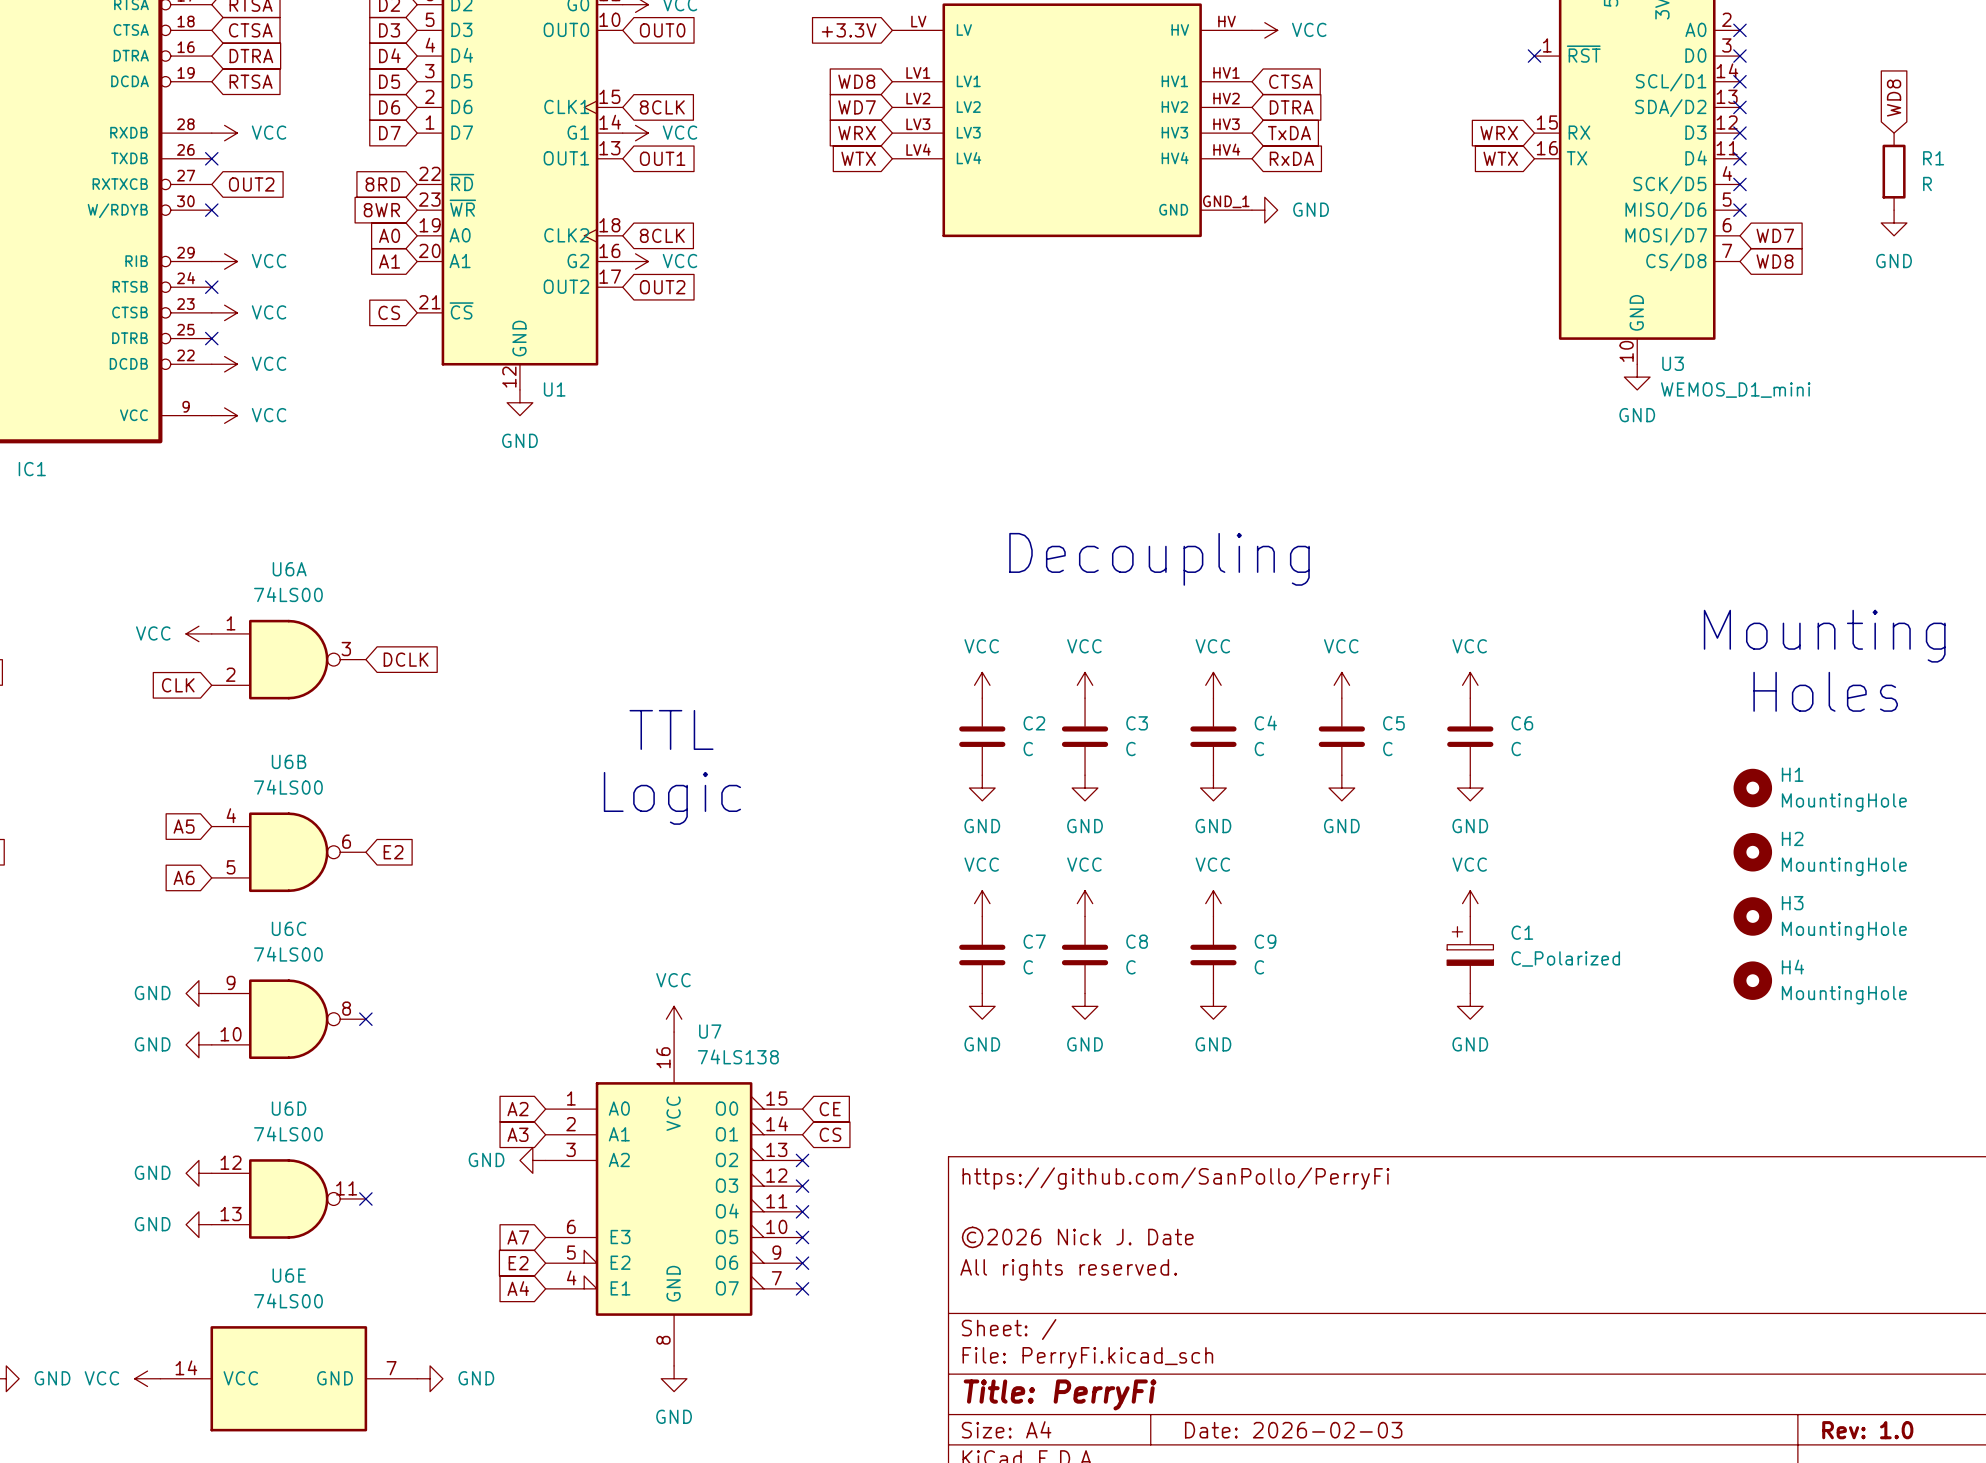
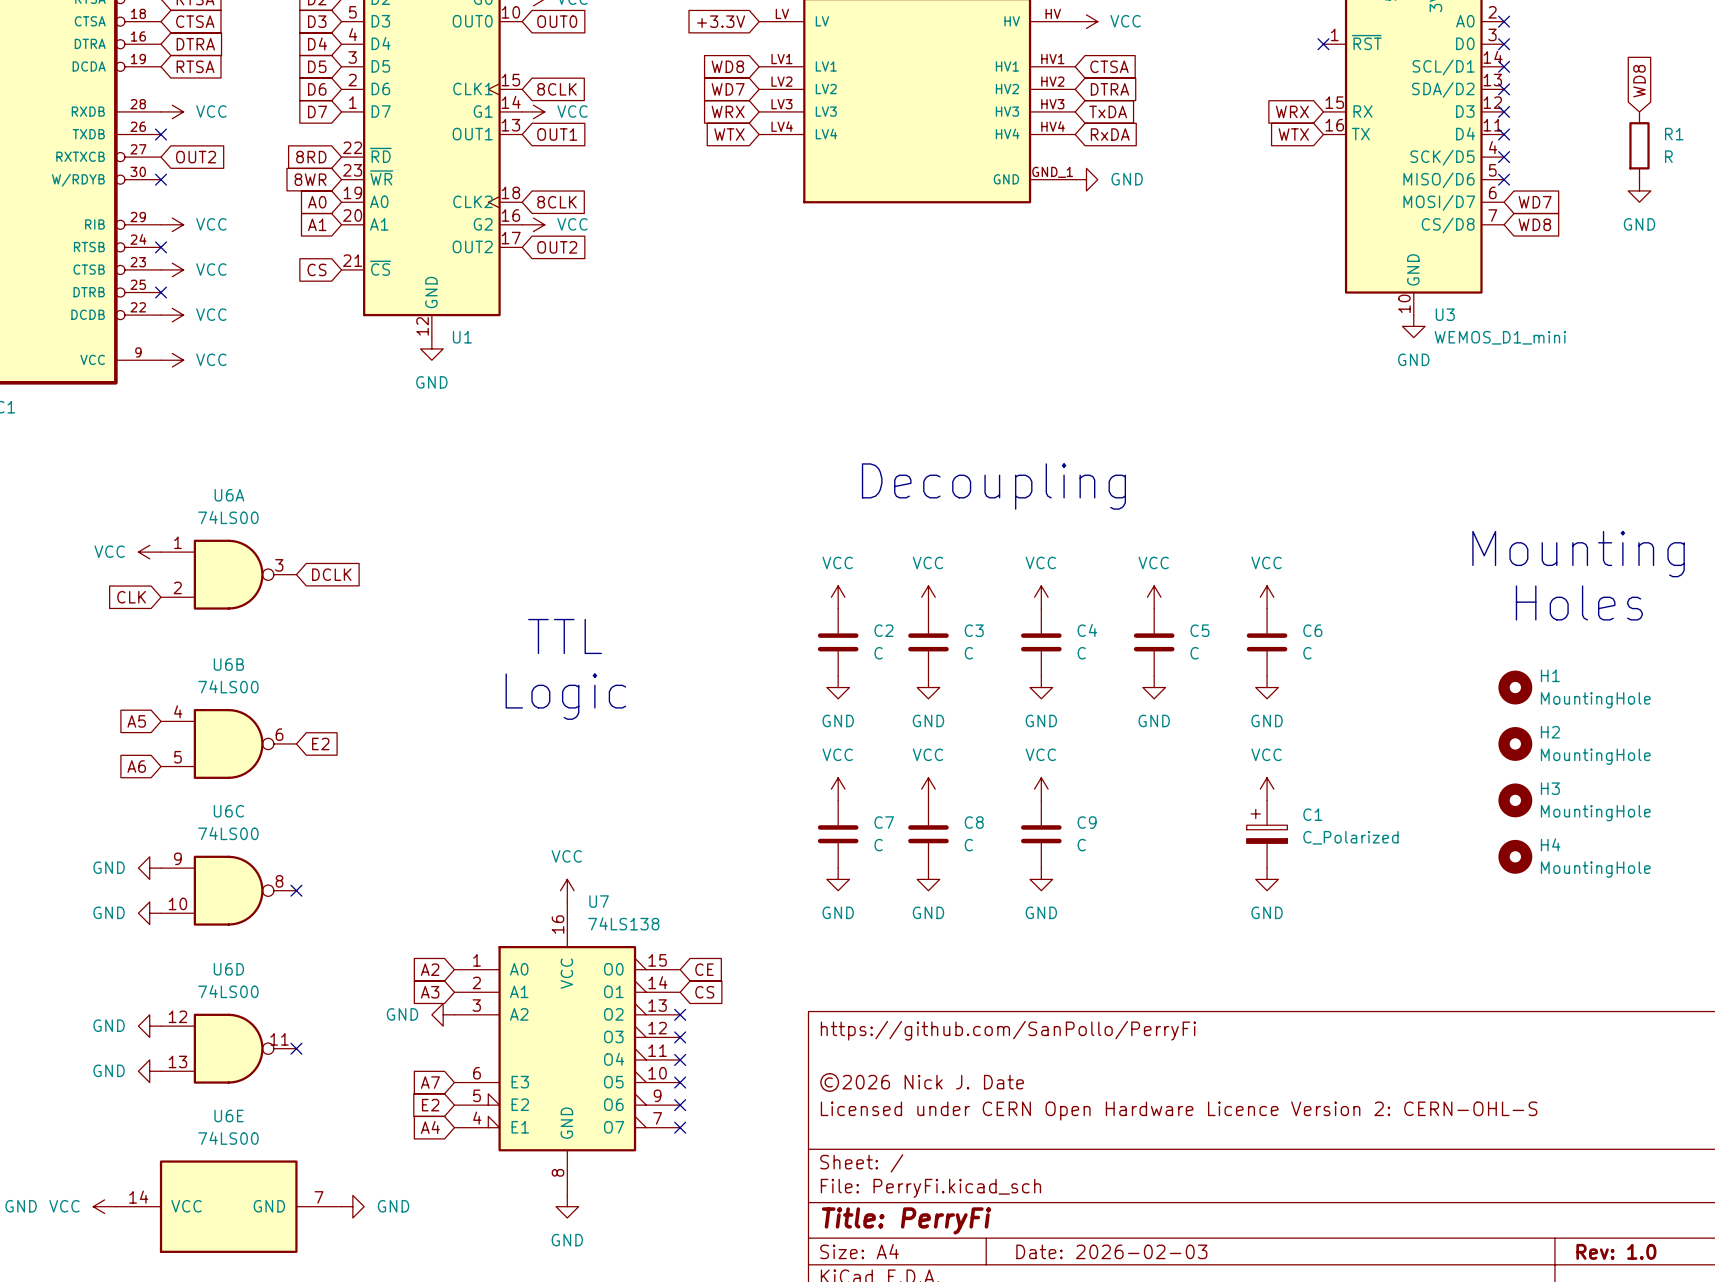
title block: All rights reserved. (1068, 1269) -> Licensed under CERN Open Hardware Licence Version 2: CERN-OHL-S (1179, 1111)

